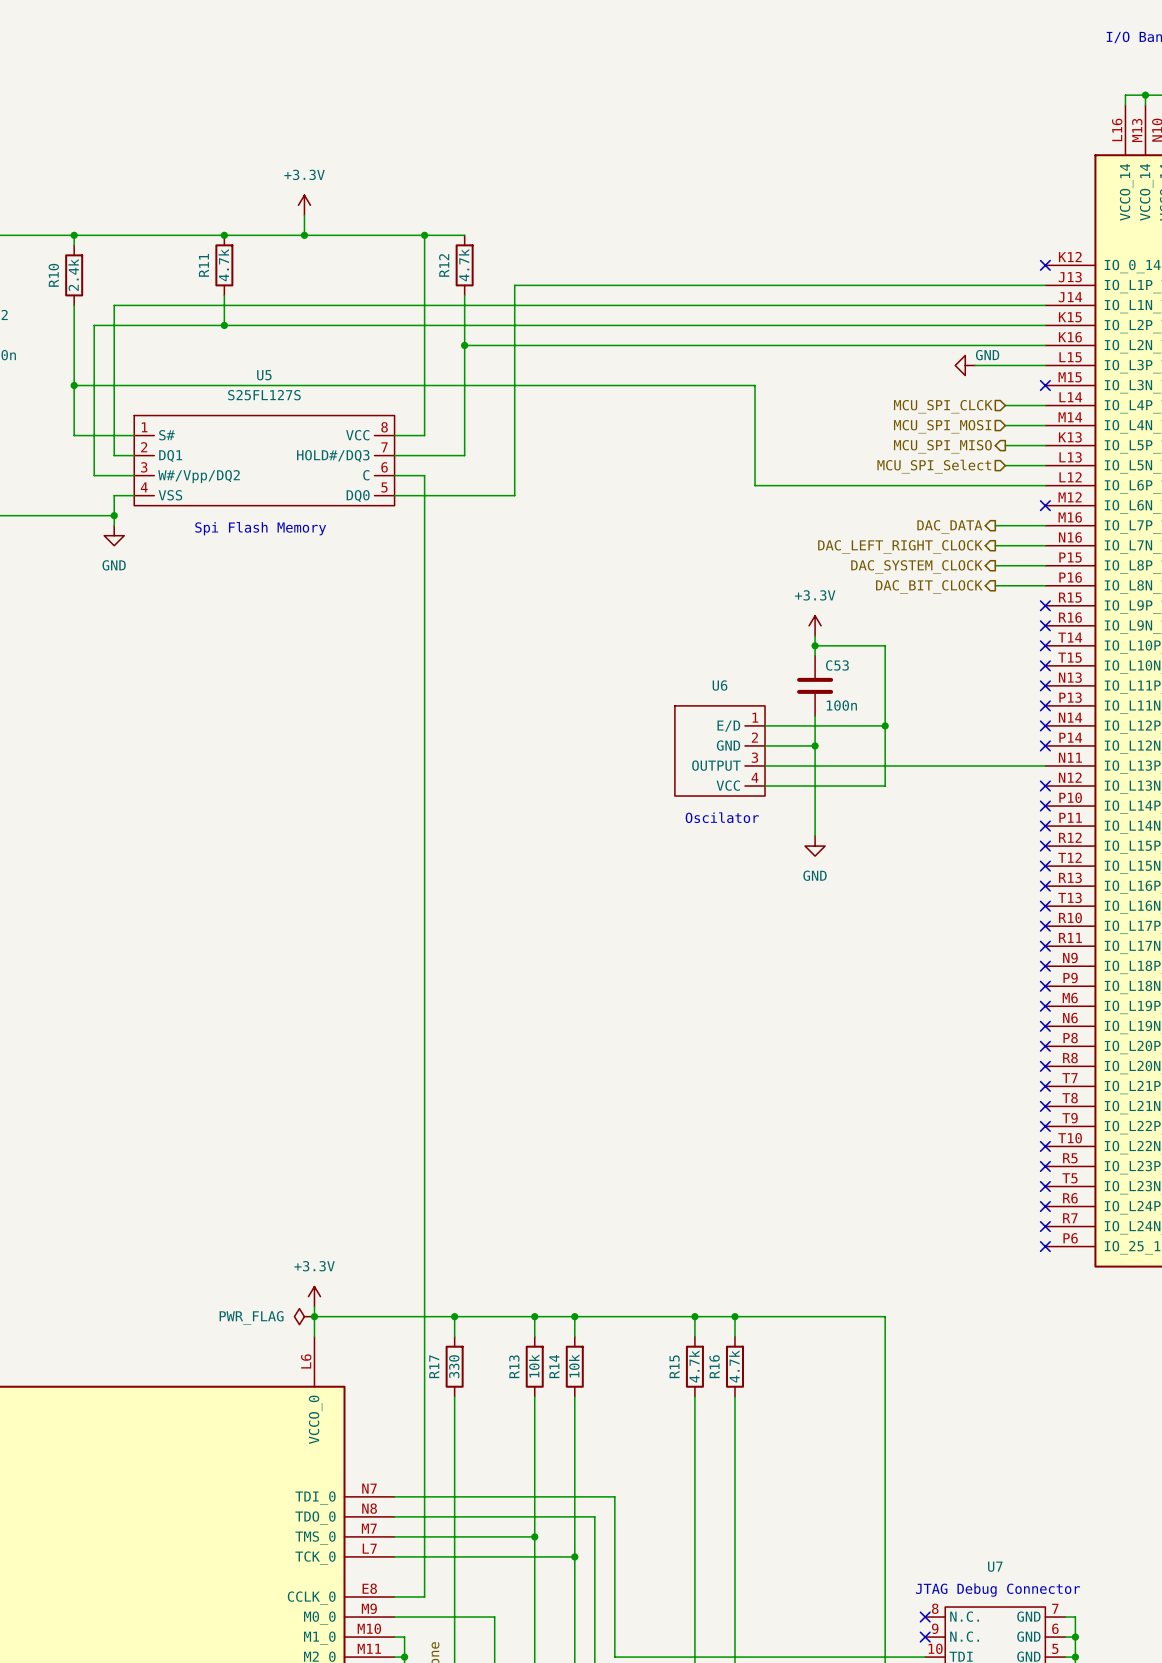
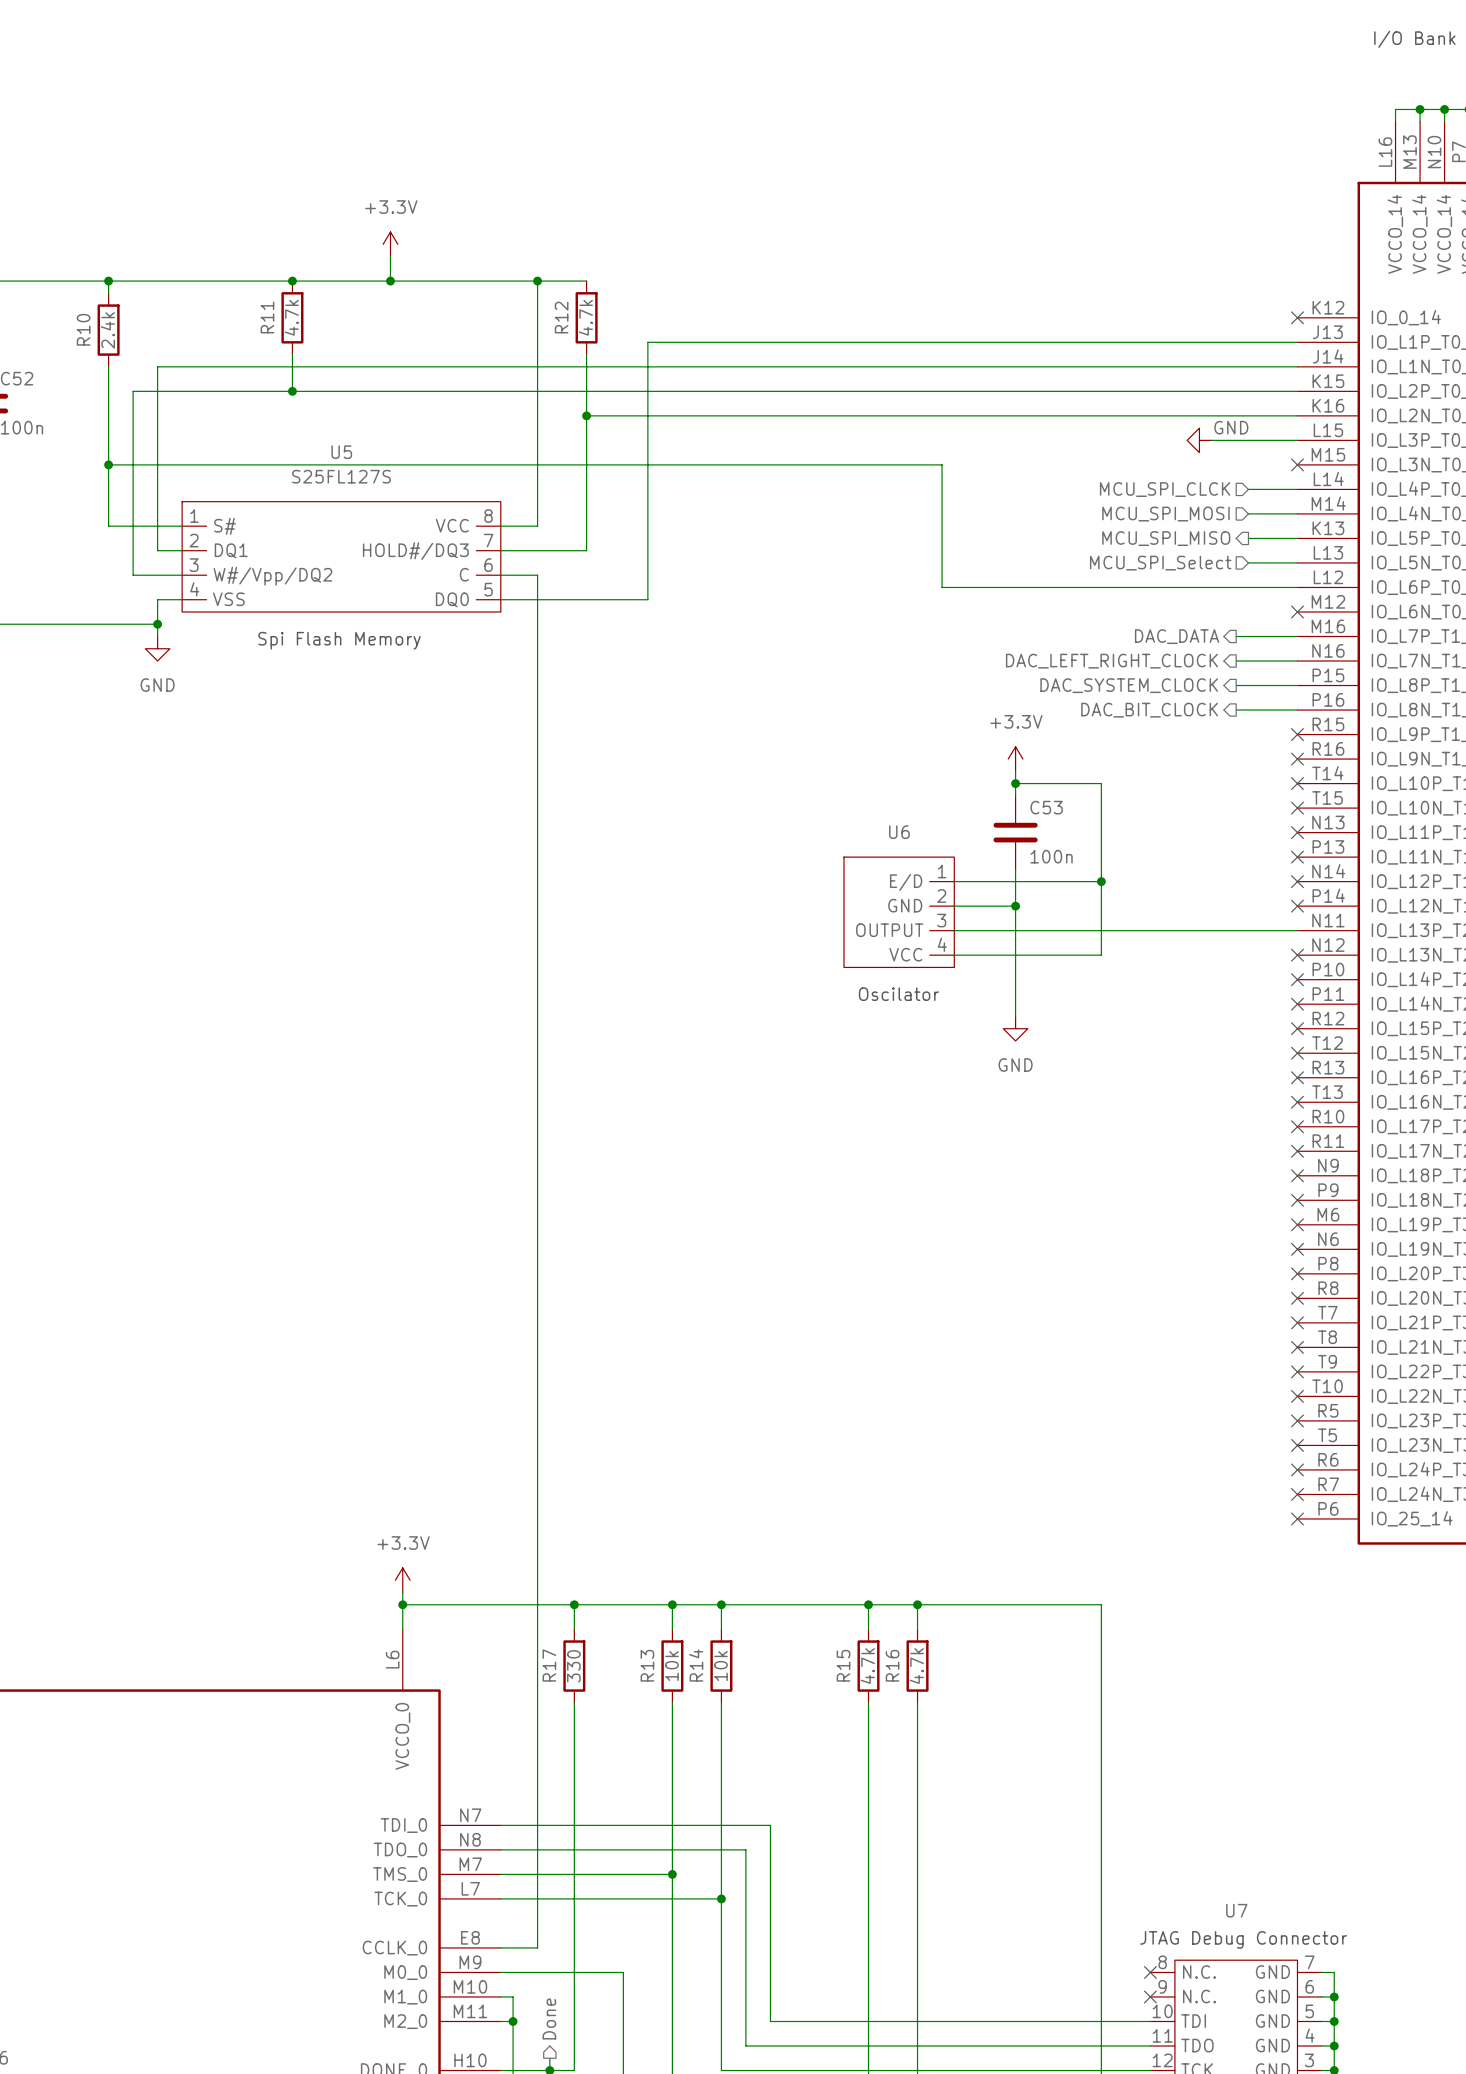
power symbol: PWR_FLAG (304, 1316) -> none

